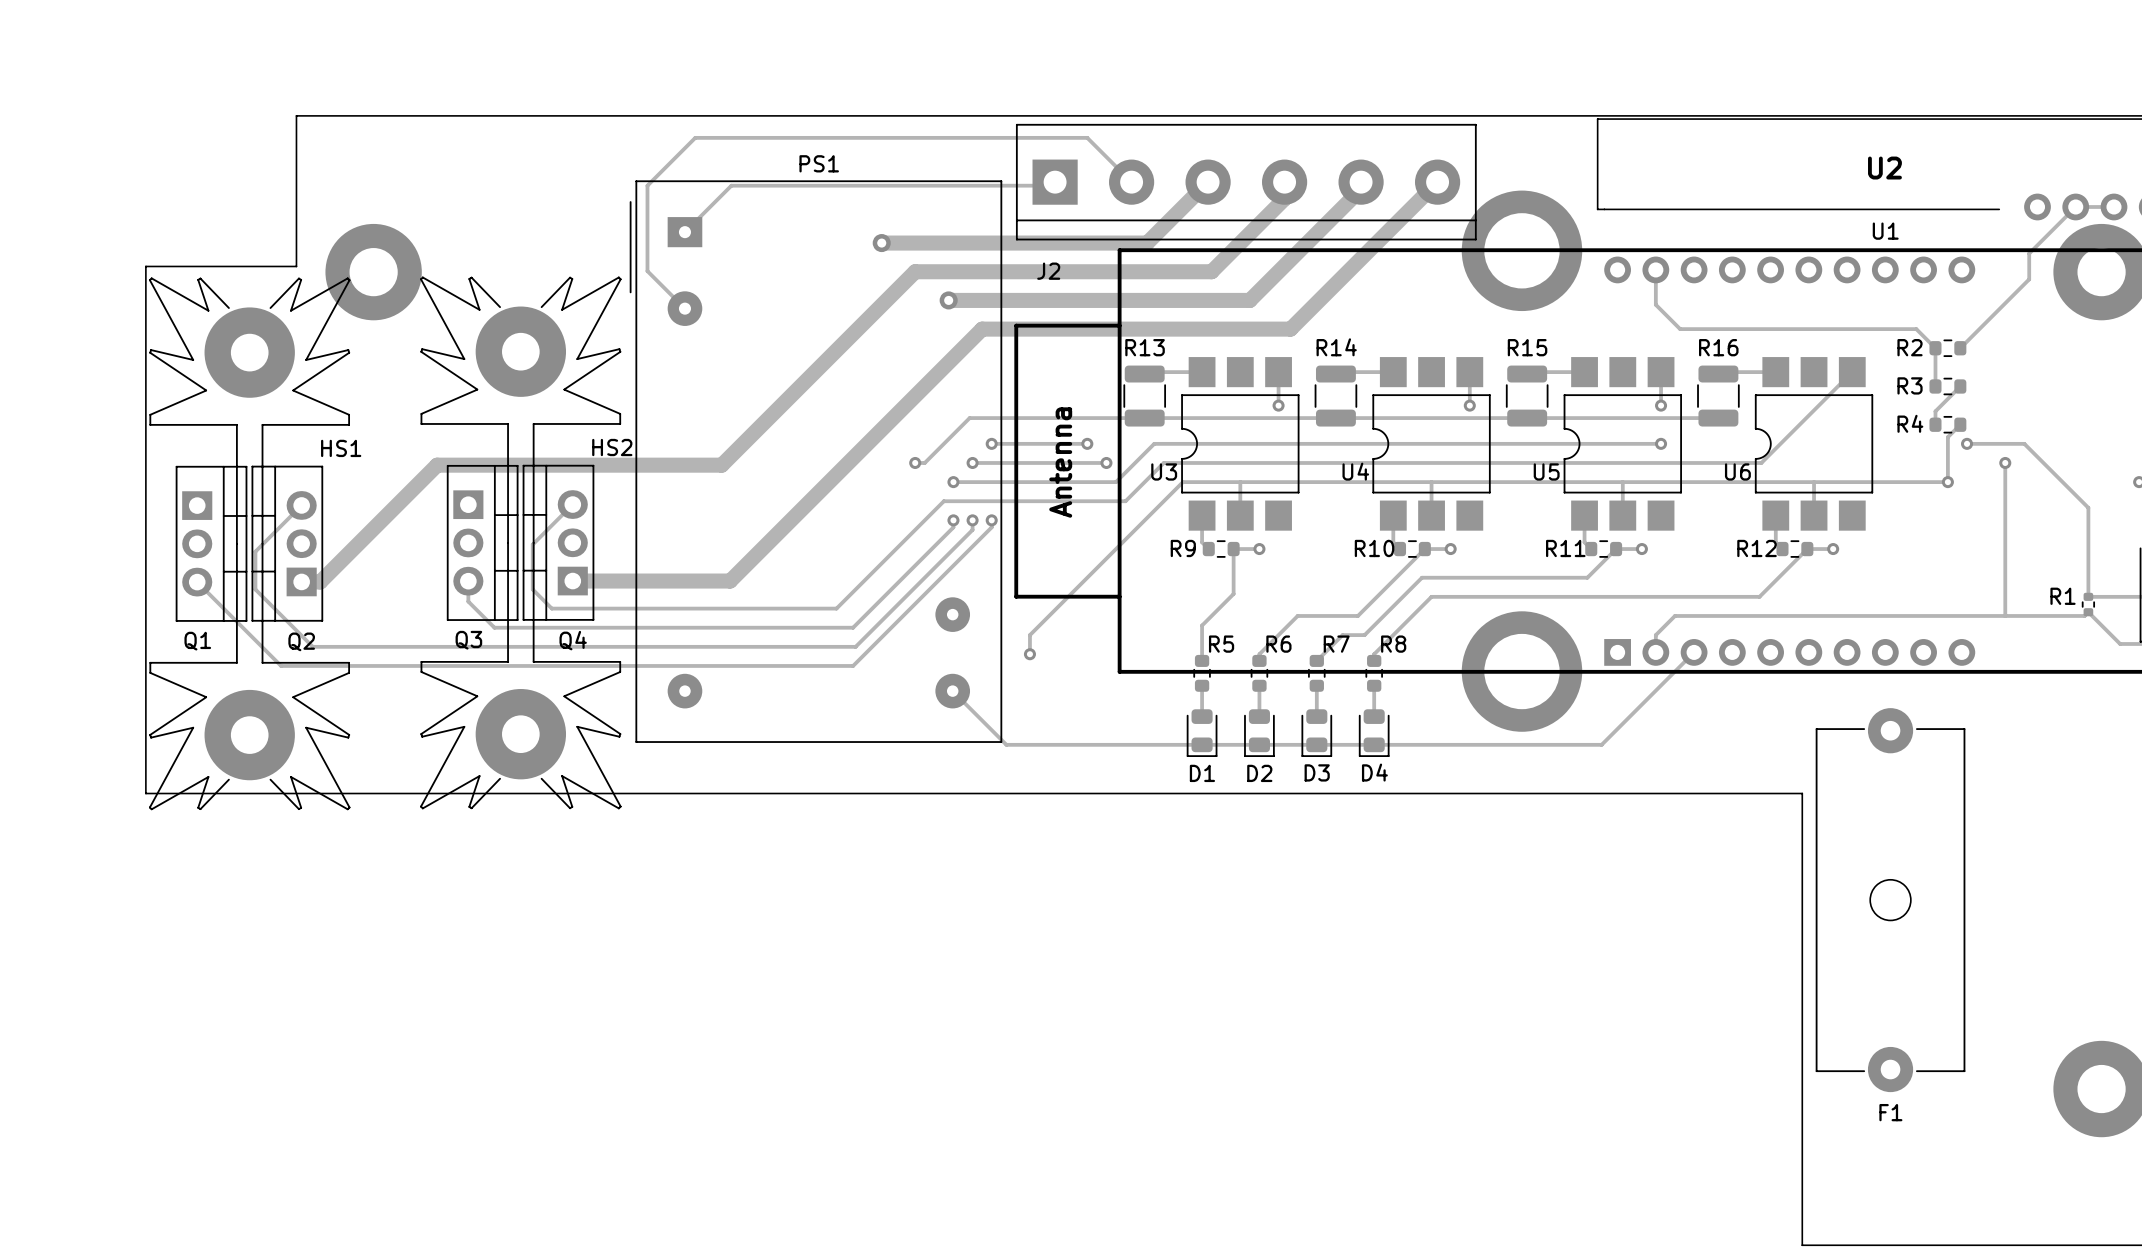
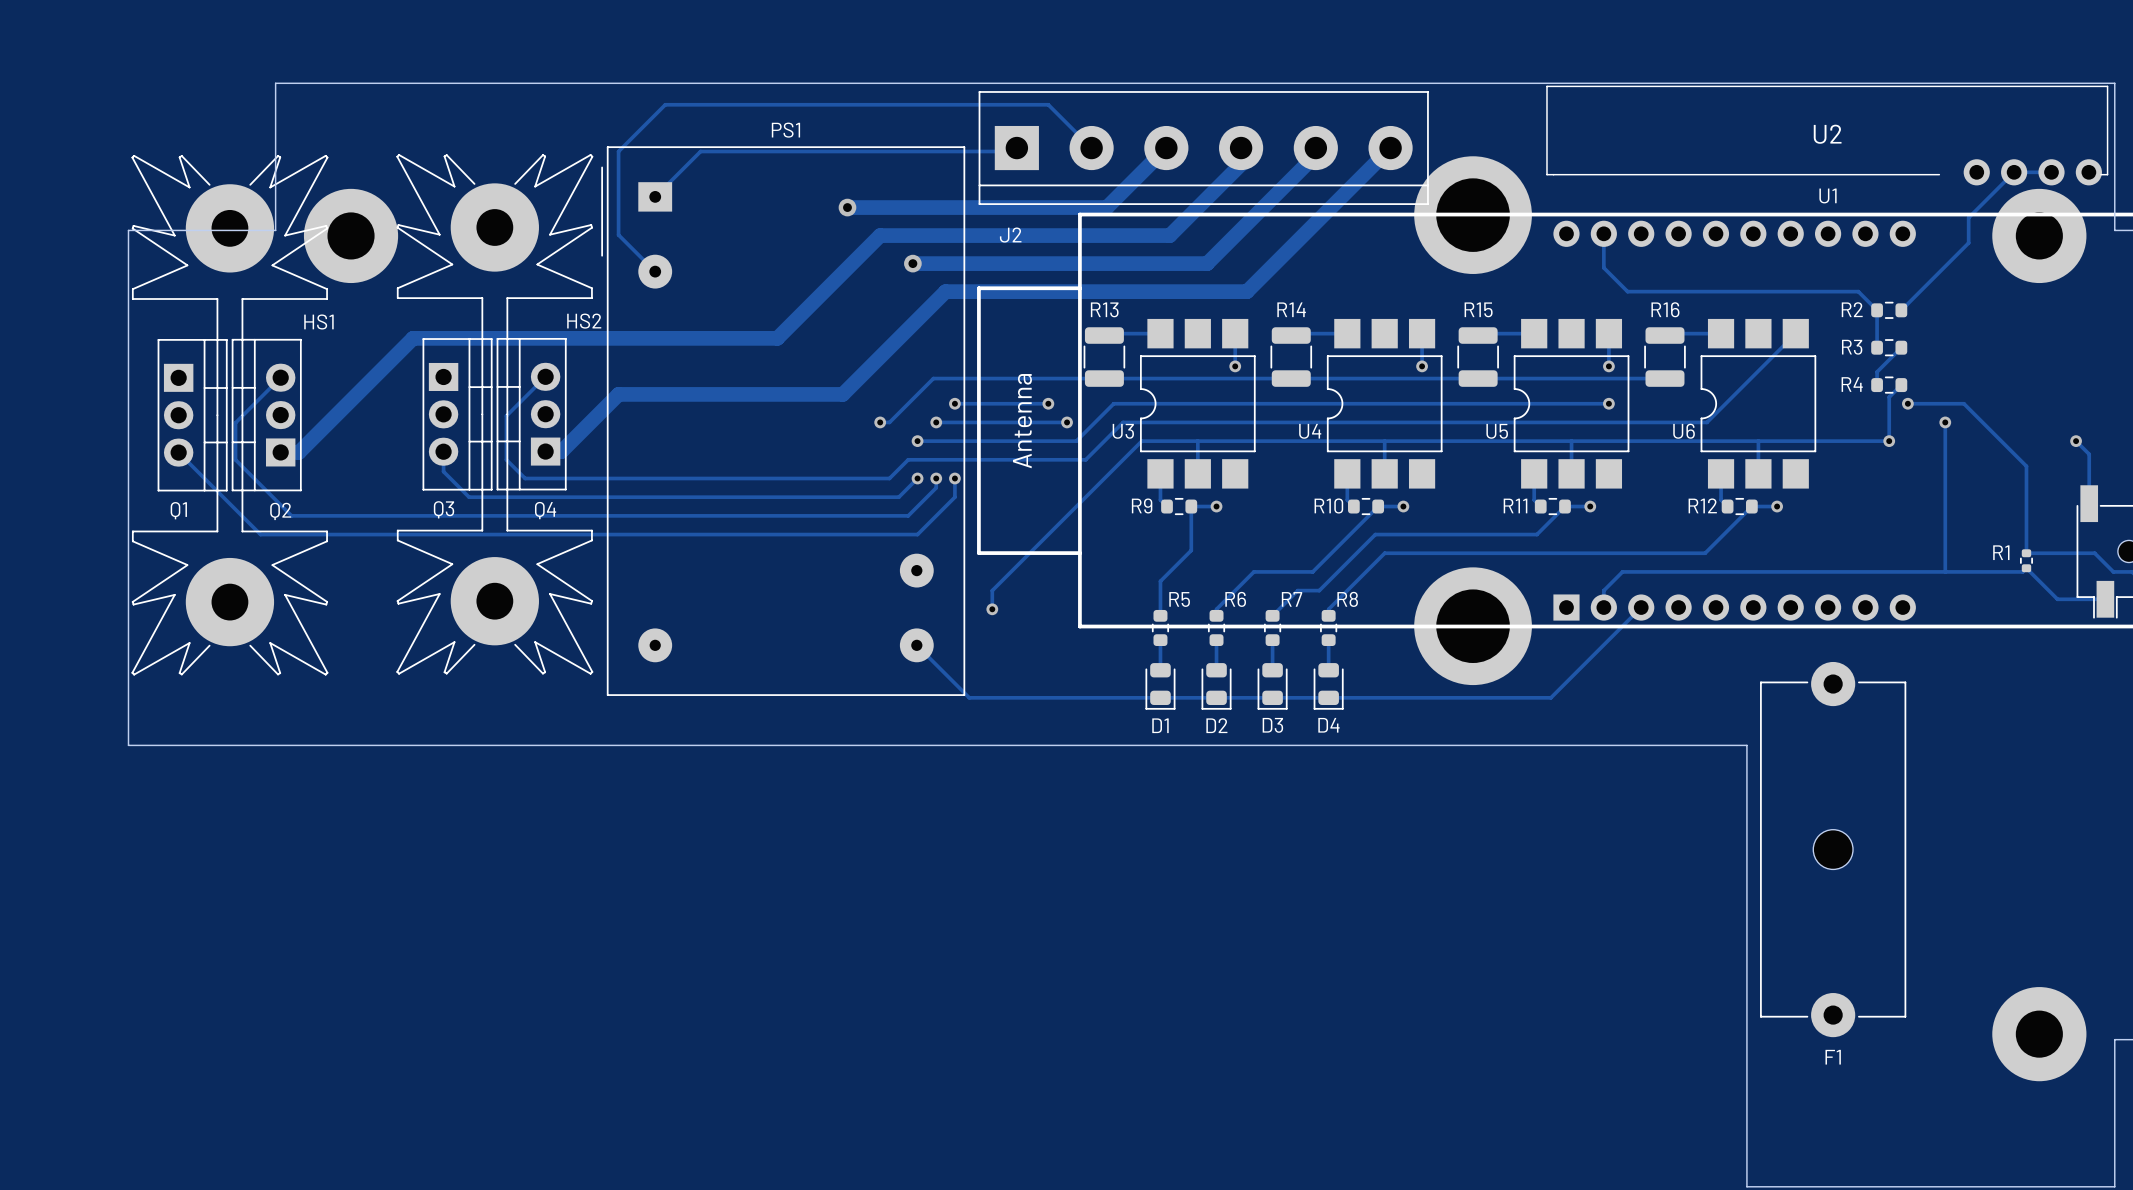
track: (810, 376) (721, 465) (437, 465) (320, 581) (301, 581) -> (777, 338) (413, 338) (298, 452) (280, 452)
track: (876, 434) (730, 581) (572, 581) -> (842, 394) (618, 394) (561, 451) (545, 451)
track: (572, 504) (532, 544) (532, 589) (551, 608) (836, 608) (924, 520) -> (545, 376) (506, 415) (506, 459) (525, 478) (889, 478)
track: (301, 505) (255, 551) (255, 589) (312, 646) (855, 646) (943, 558) -> (280, 377) (235, 422) (235, 459) (291, 515) (908, 515)
track: (953, 520) (953, 527) (853, 627) (494, 627) (468, 601) (468, 581) -> (917, 478) (898, 497) (469, 497) (443, 471) (443, 451)
track: (991, 527) (853, 665) (281, 665) (197, 582) -> (954, 485) (954, 497) (917, 534) (260, 534) (178, 452)
Q3 position: (482, 542) -> (457, 414)
HS2 position: (520, 542) -> (494, 414)
Q4 position: (558, 542) -> (531, 414)
Q1 position: (211, 543) -> (192, 415)
HS1 position: (249, 543) -> (229, 415)
Q2 position: (287, 543) -> (266, 415)

